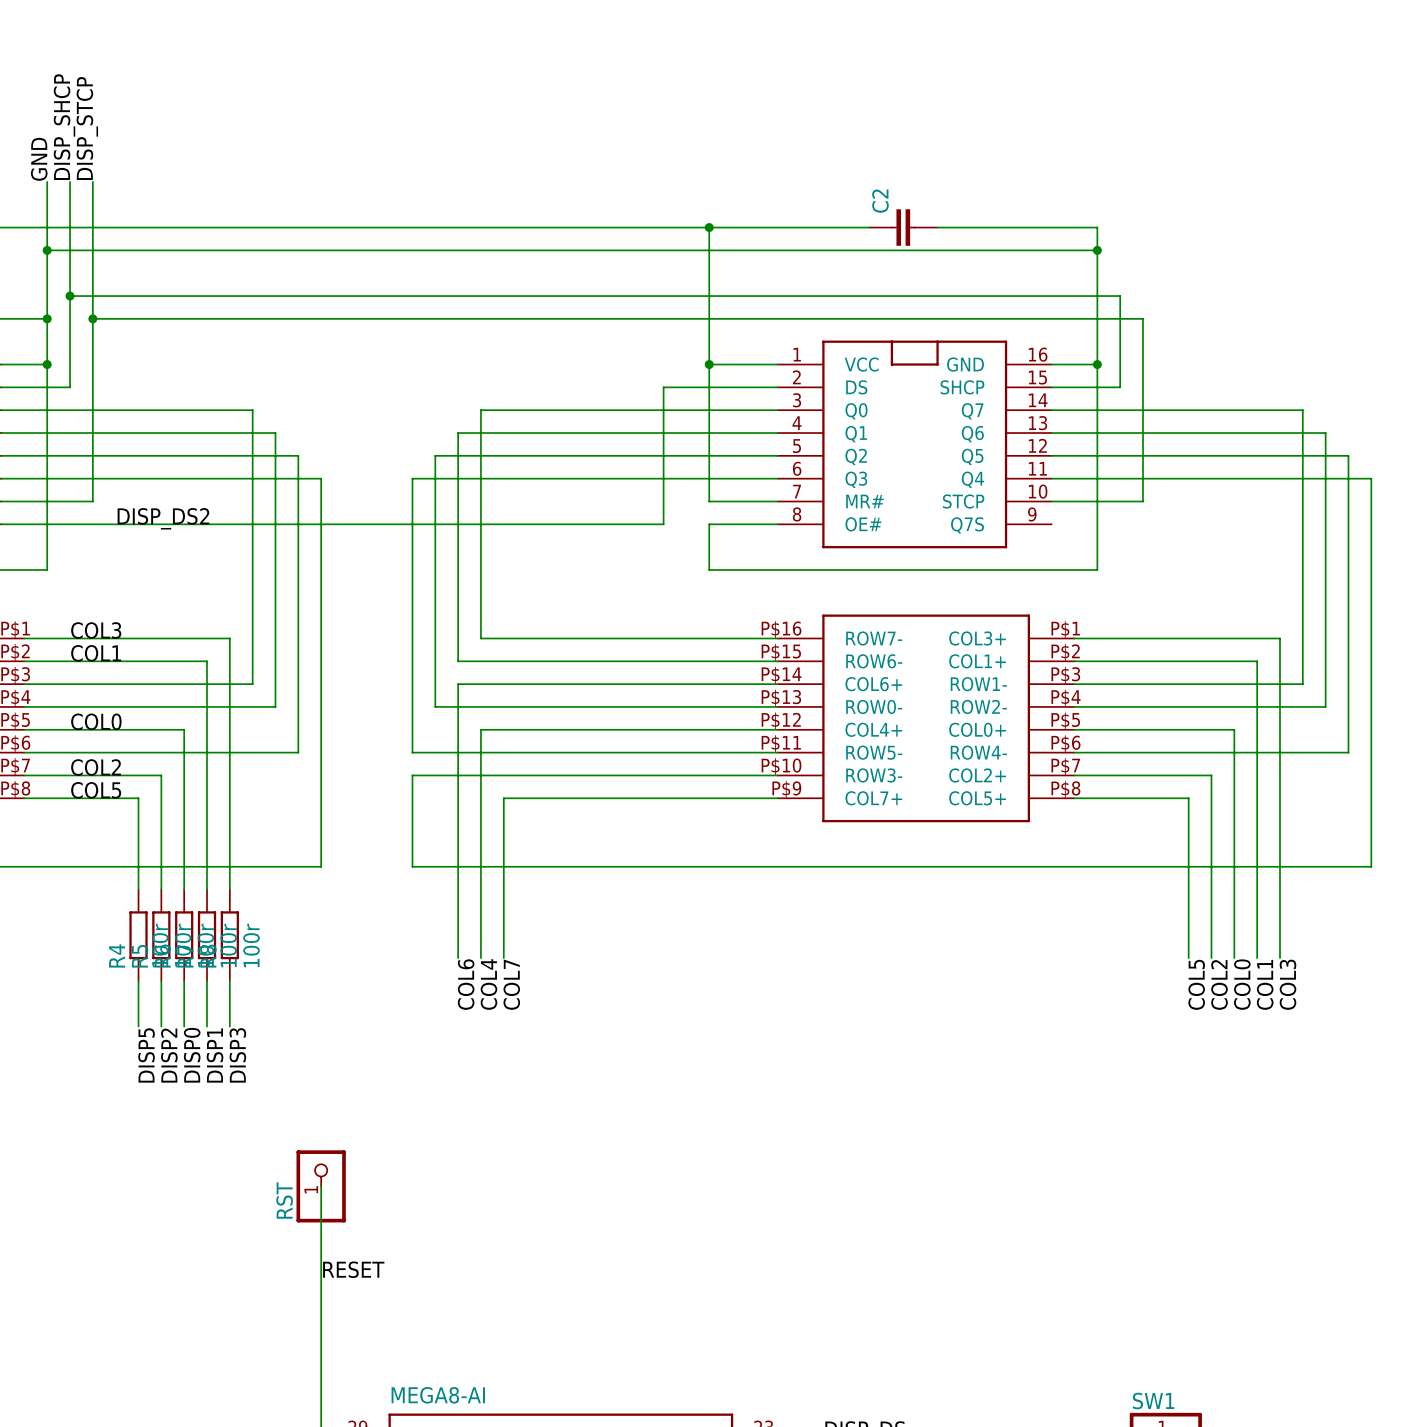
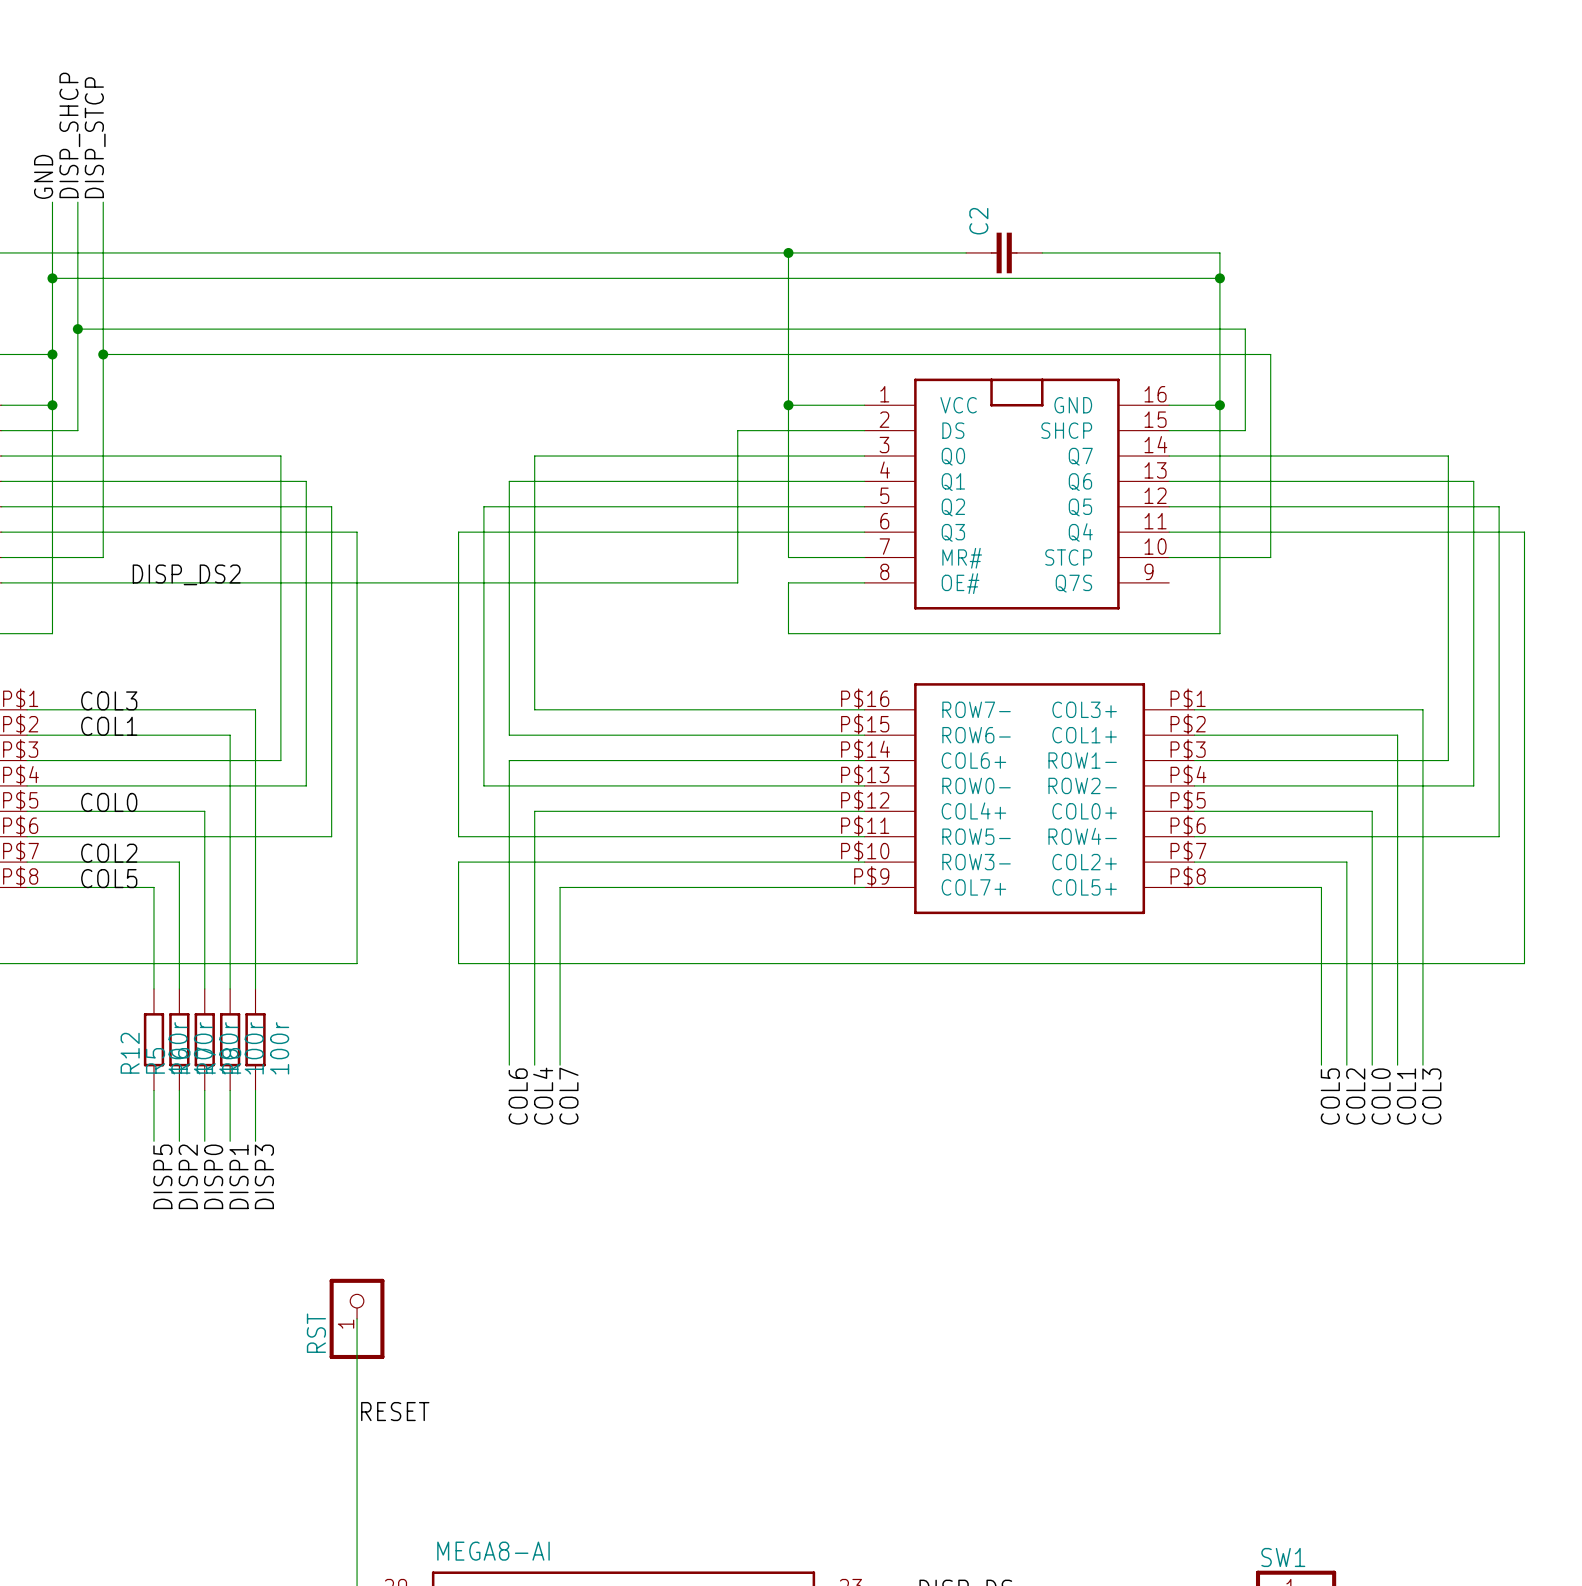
R4 name: R4 (117, 955) -> R12 (130, 1053)

